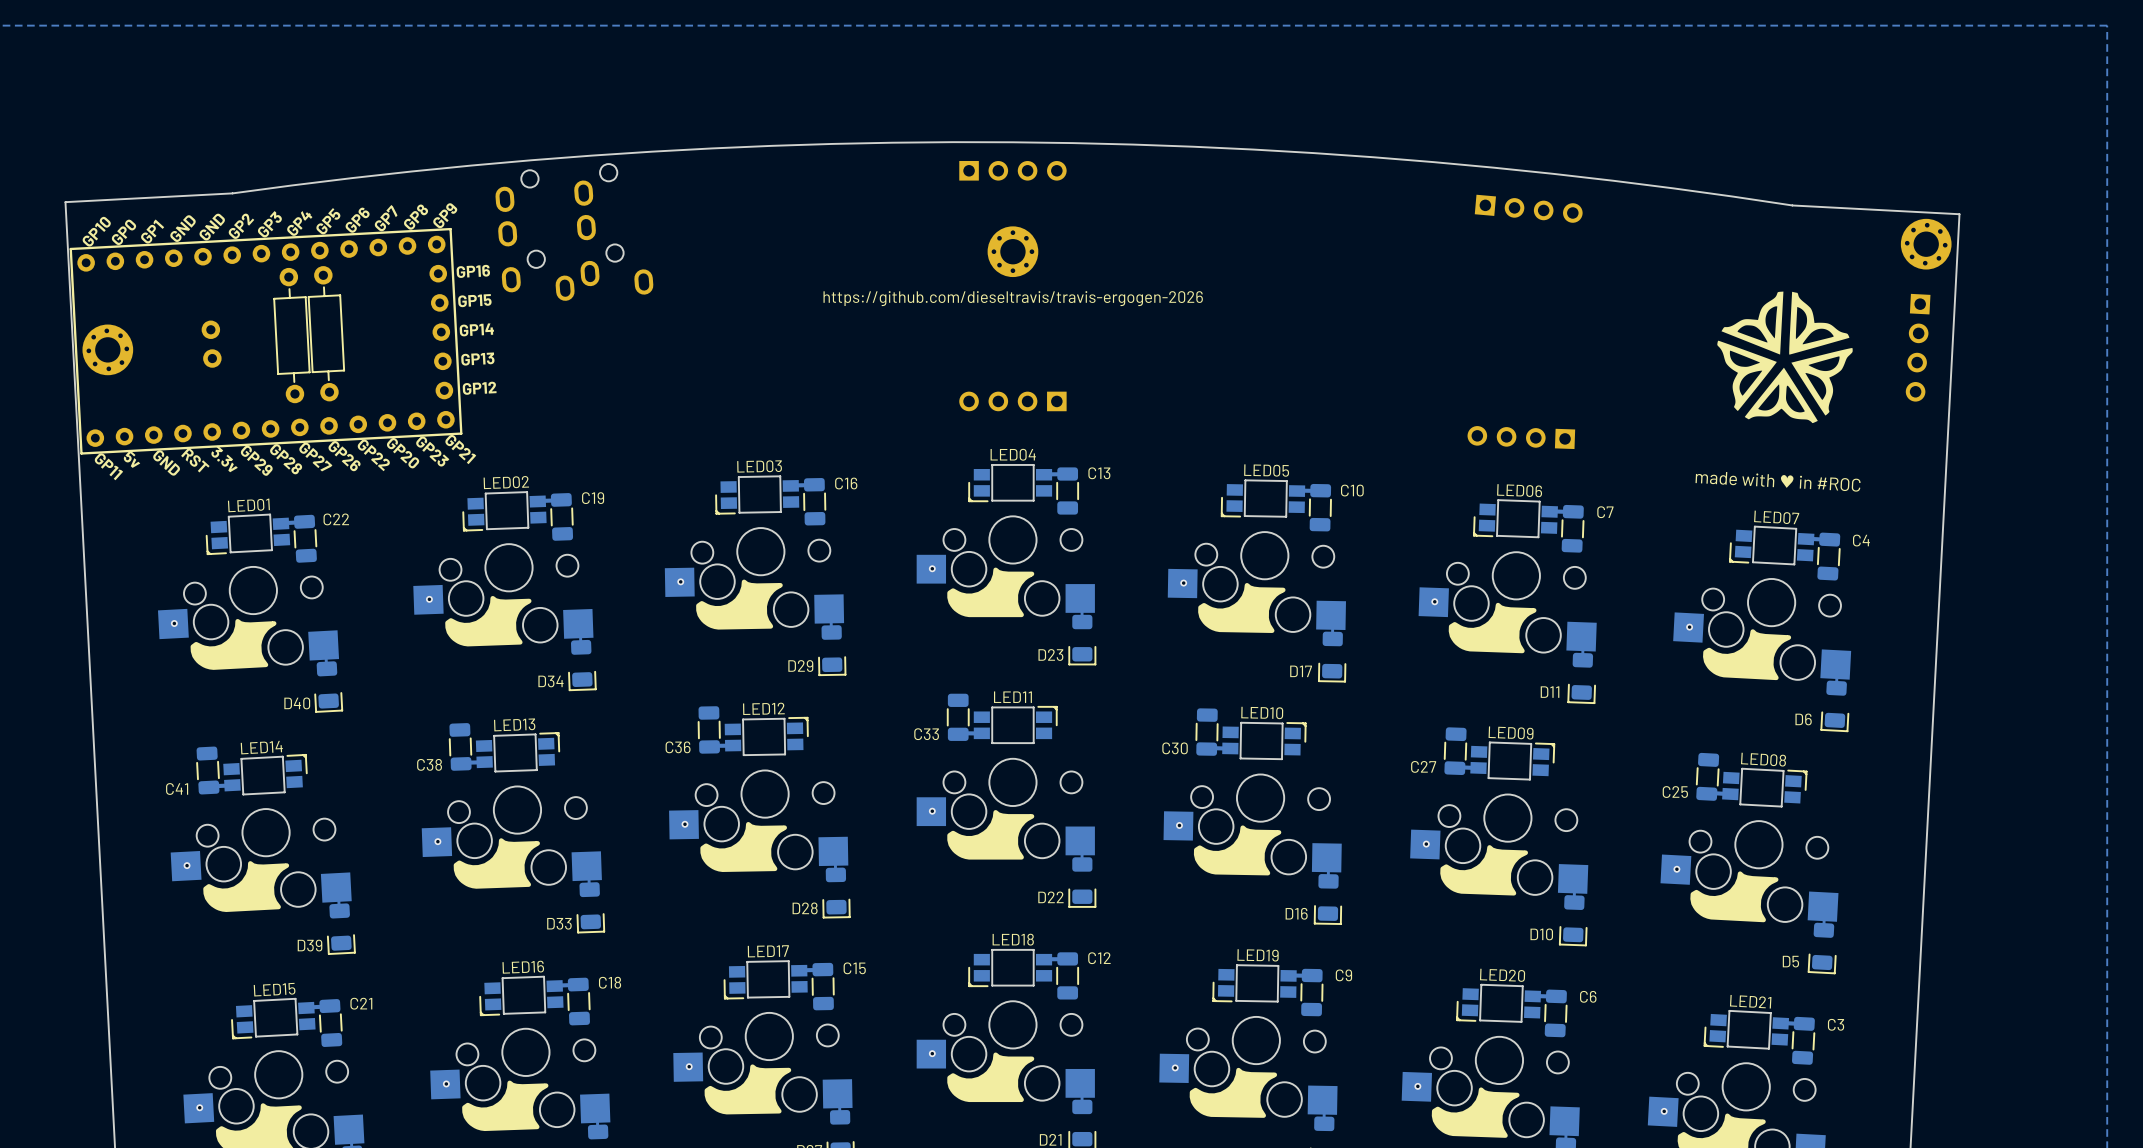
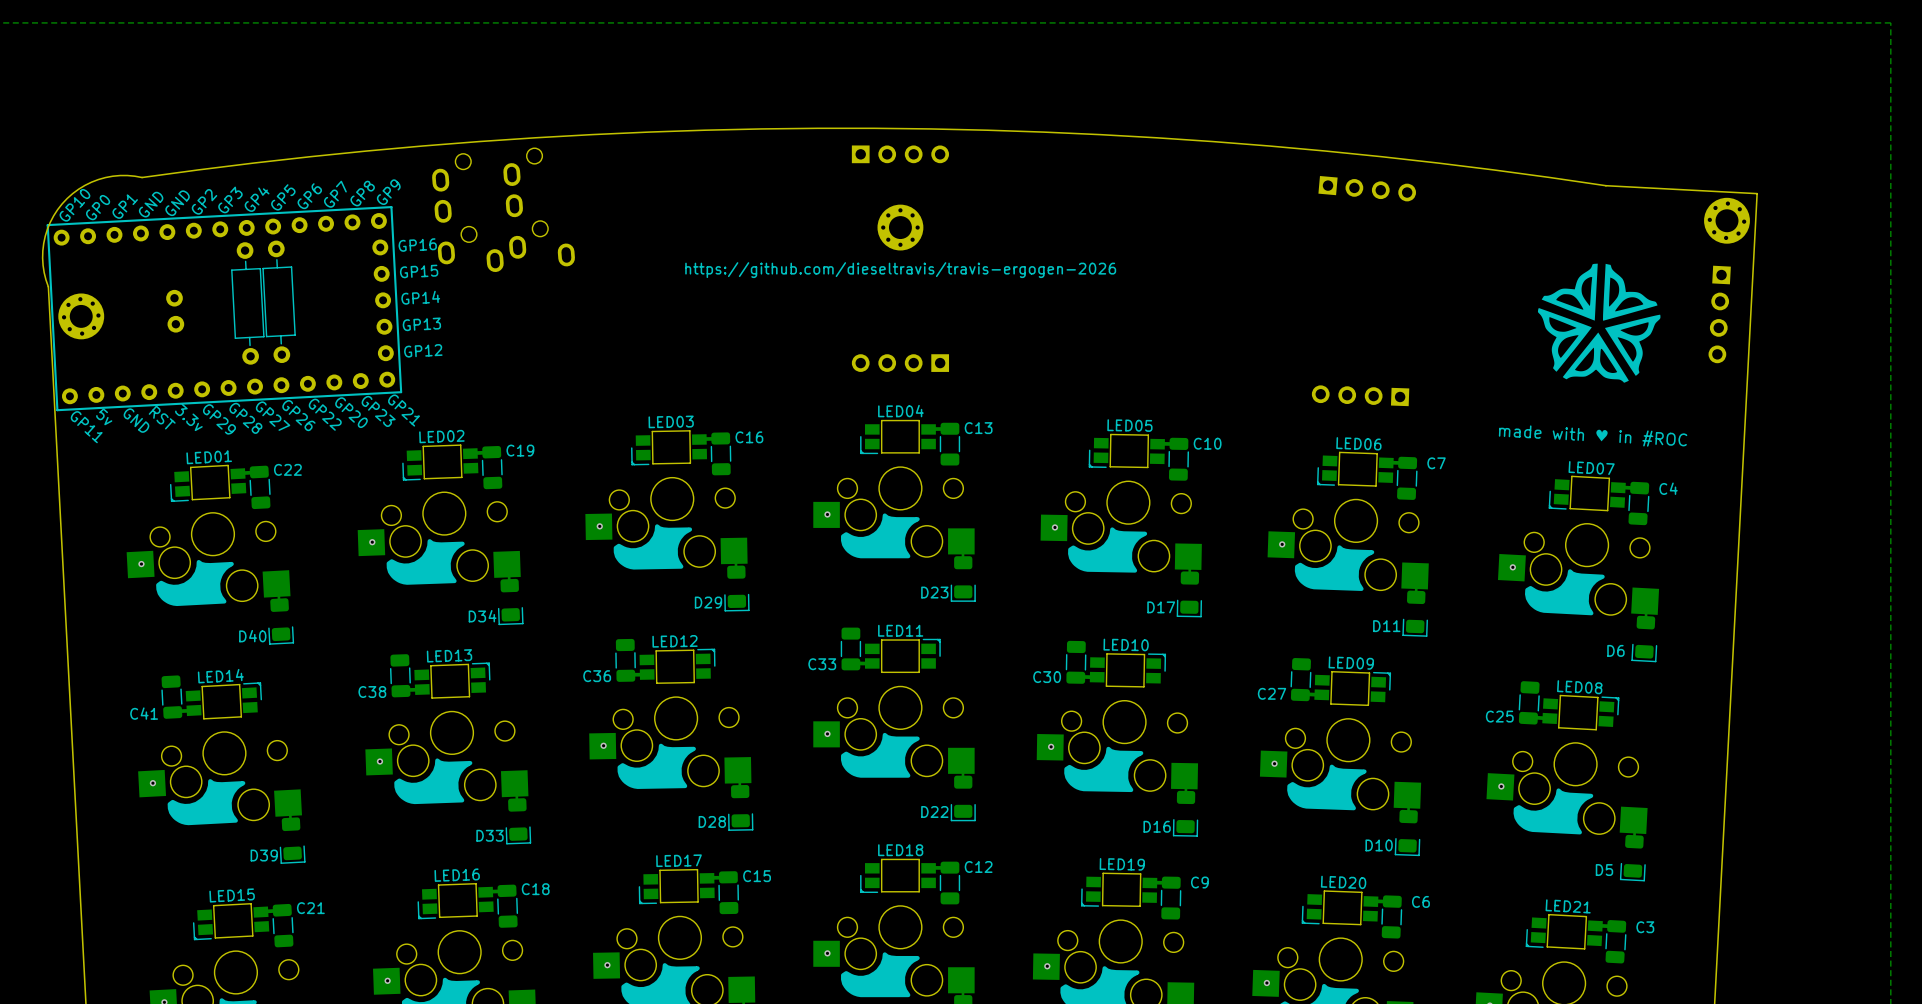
board edge: (1792, 205) (1673, 188) (1493, 167) (1313, 153) (1193, 146) (952, 142) (772, 145) (651, 151) (471, 165) (232, 193) (65, 202) (71, 317) -> (1605, 185) (1437, 163) (1325, 151) (1212, 141) (1043, 132) (874, 128) (761, 128) (535, 137) (366, 151) (142, 177) (120, 175) (98, 179) (78, 189) (67, 198) (50, 222) (45, 236) (42, 258) (48, 286)

